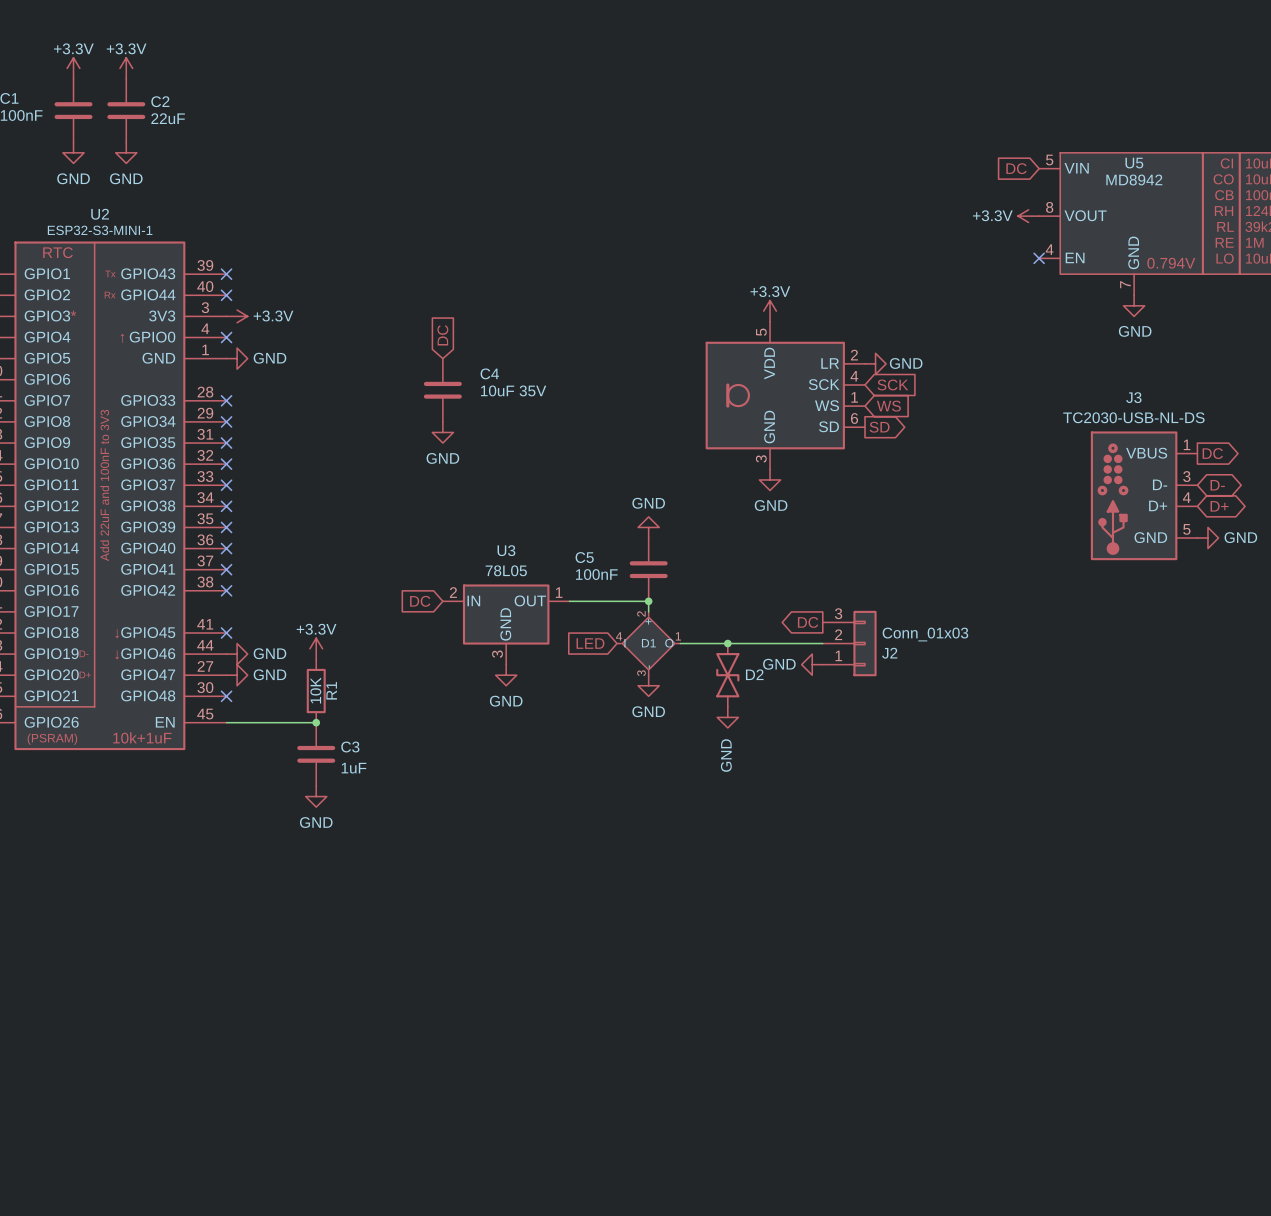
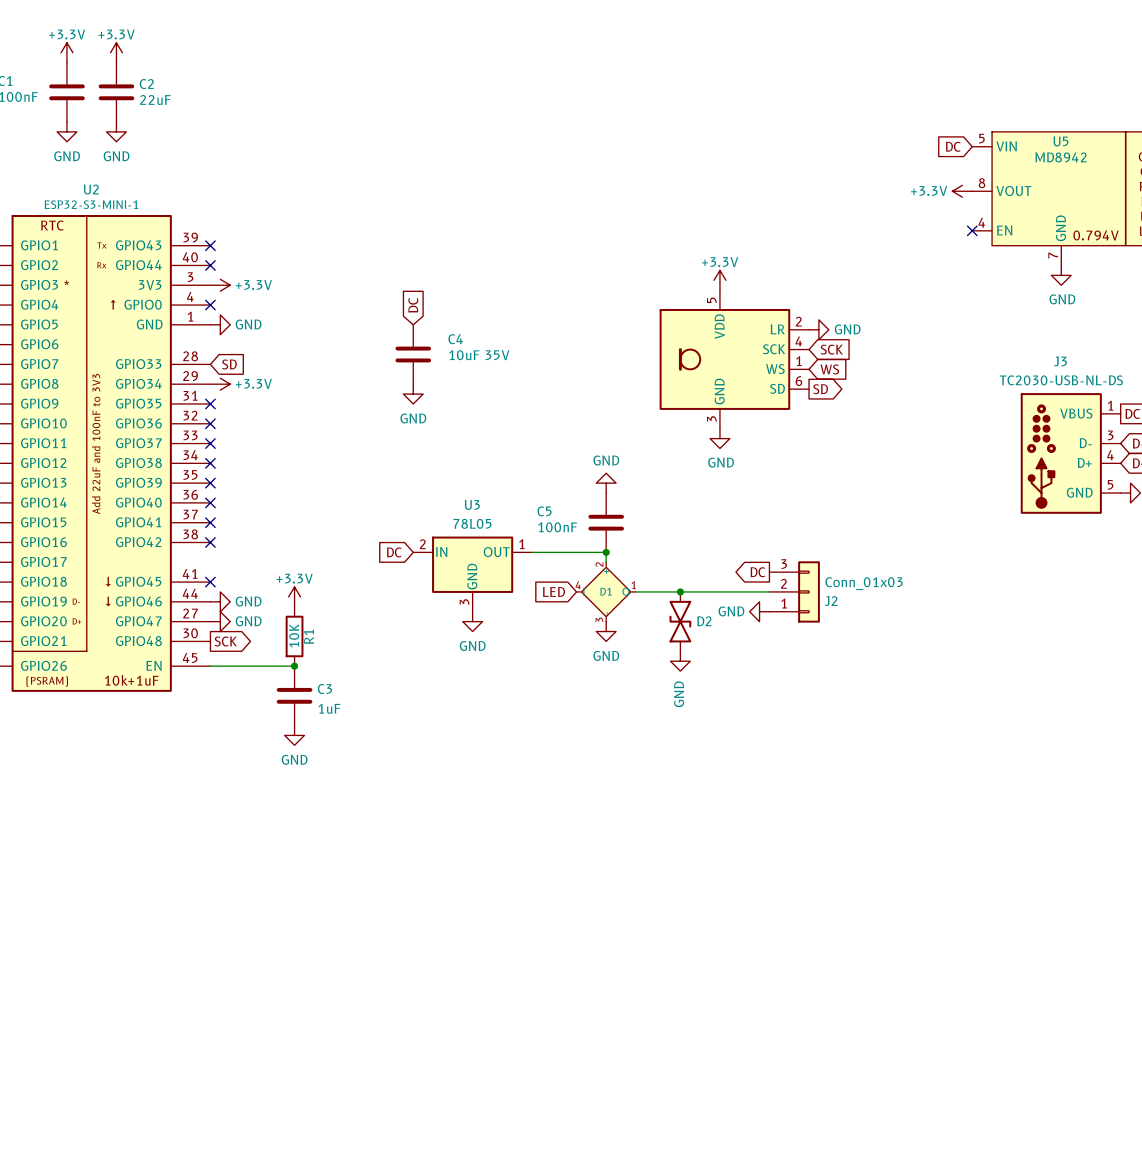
no-connect mark: (226, 400) -> none
global label: none -> SD (229, 364)
no-connect mark: (226, 421) -> none
power symbol: none -> +3.3V (220, 384)
no-connect mark: (226, 696) -> none
global label: none -> SCK (225, 641)

